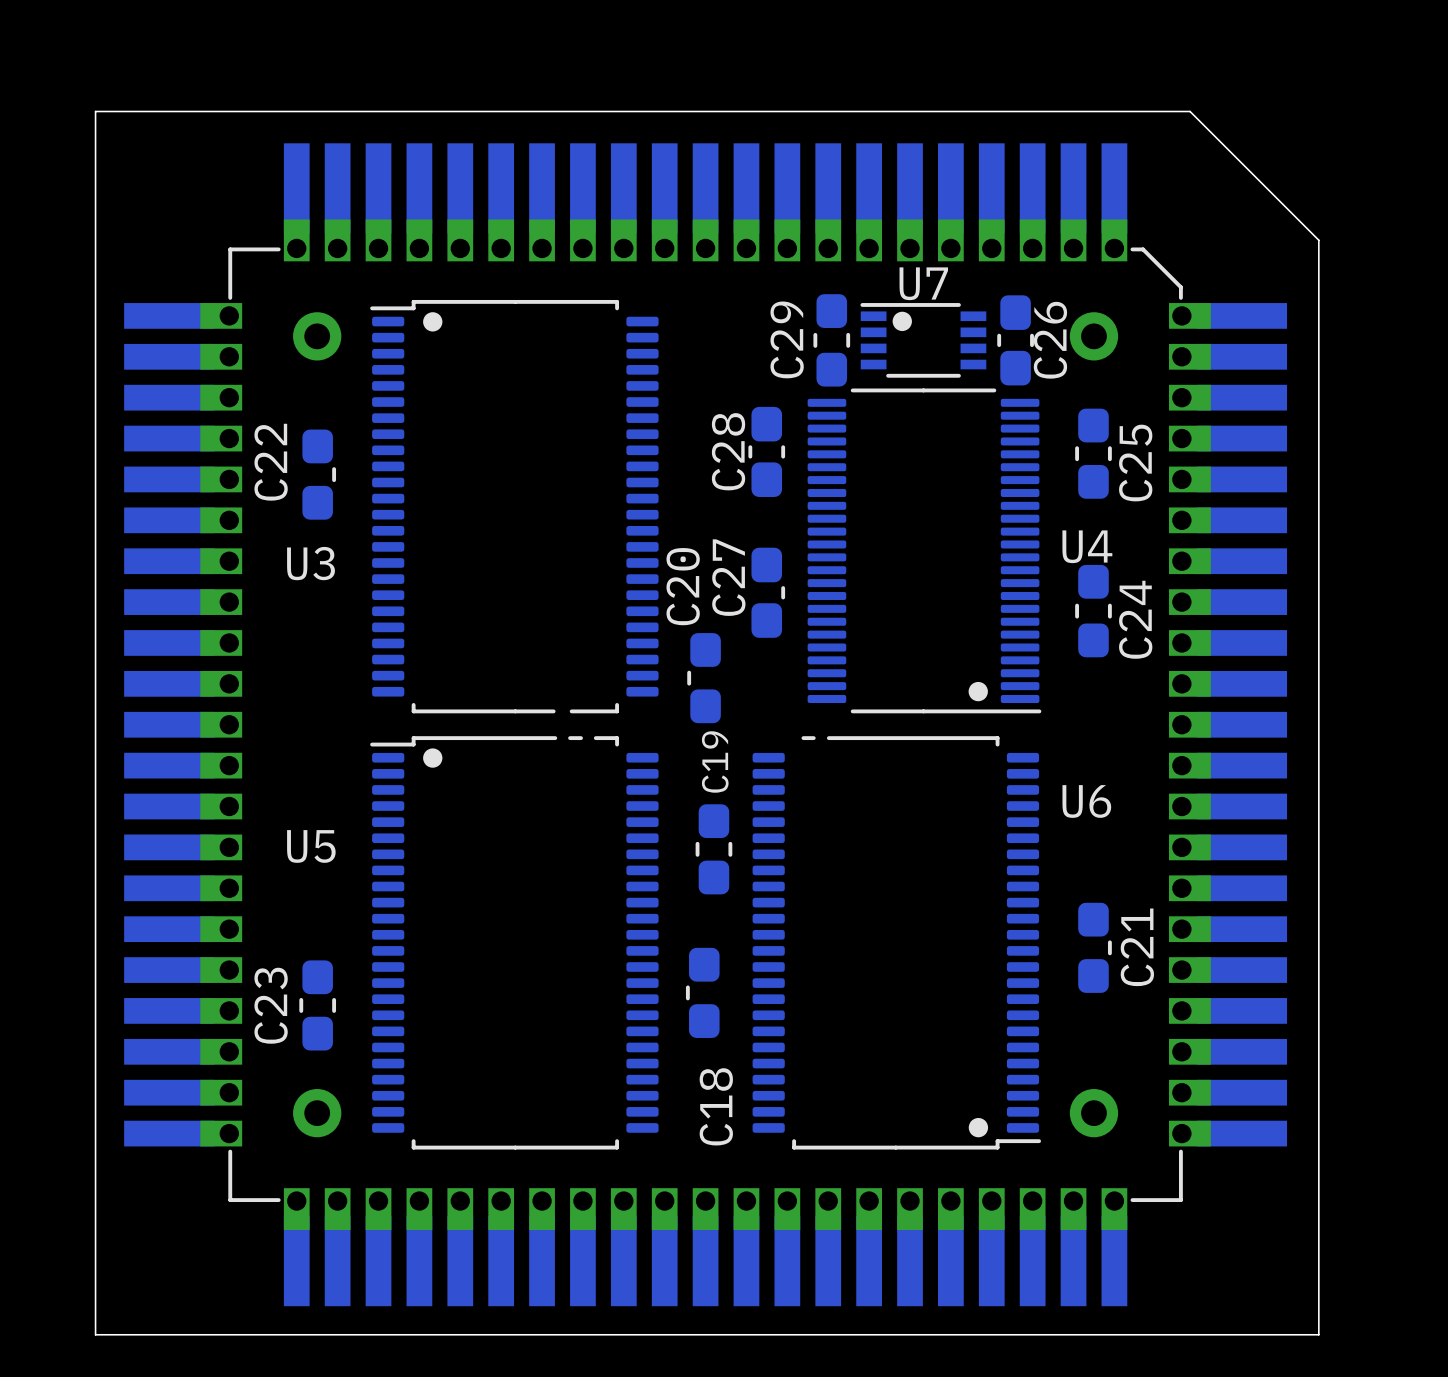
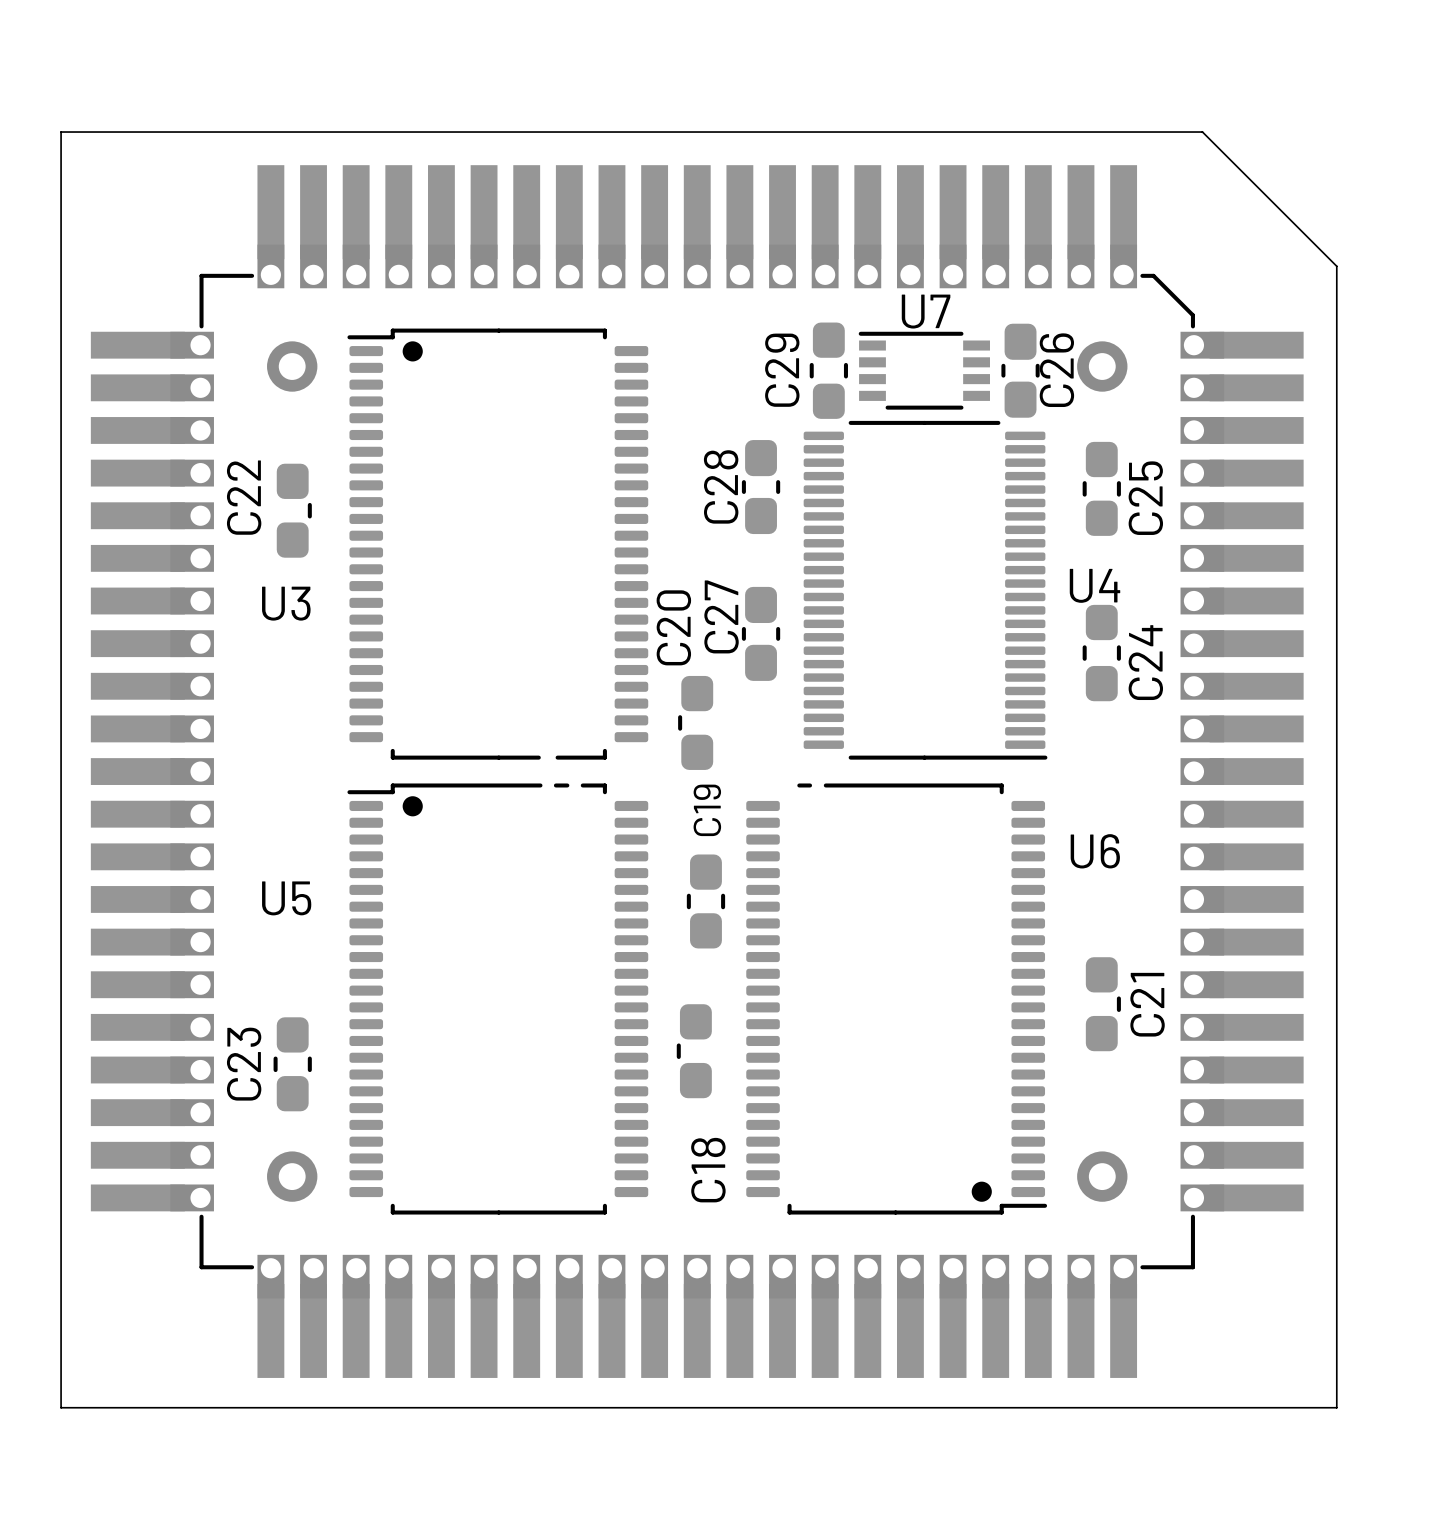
U7 footprint: [860, 303, 987, 378] -> [858, 331, 990, 410]
U4 footprint: [807, 388, 1042, 714] -> [803, 420, 1048, 760]
C27 footprint: [751, 547, 786, 638] -> [741, 586, 781, 681]

